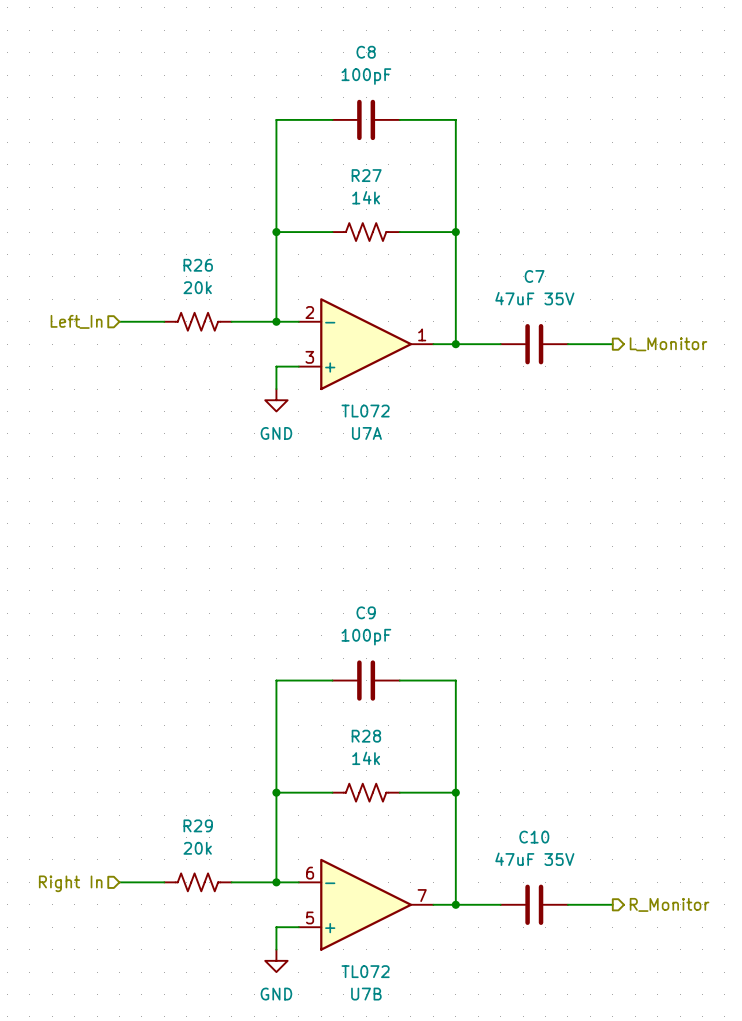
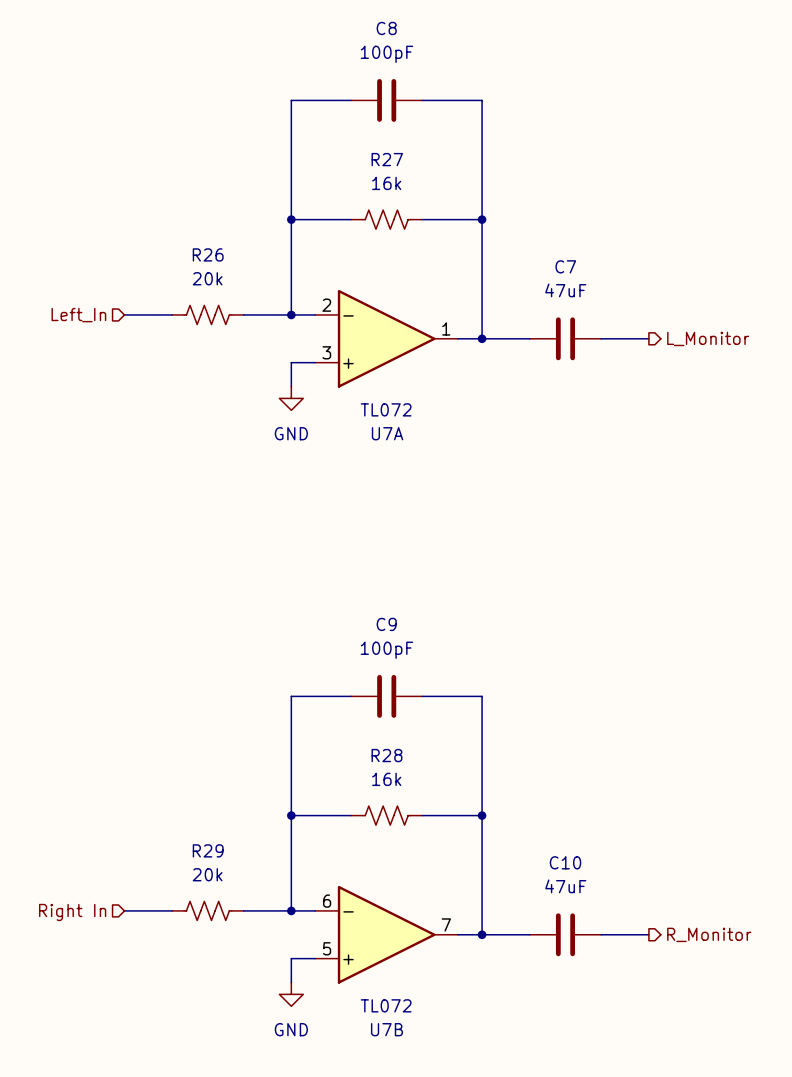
R27 value: 14k (366, 197) -> 16k (386, 183)
C7 value: 47uF 35V (534, 298) -> 47uF (565, 290)
R28 value: 14k (366, 758) -> 16k (386, 779)
C10 value: 47uF 35V (534, 859) -> 47uF (565, 886)

